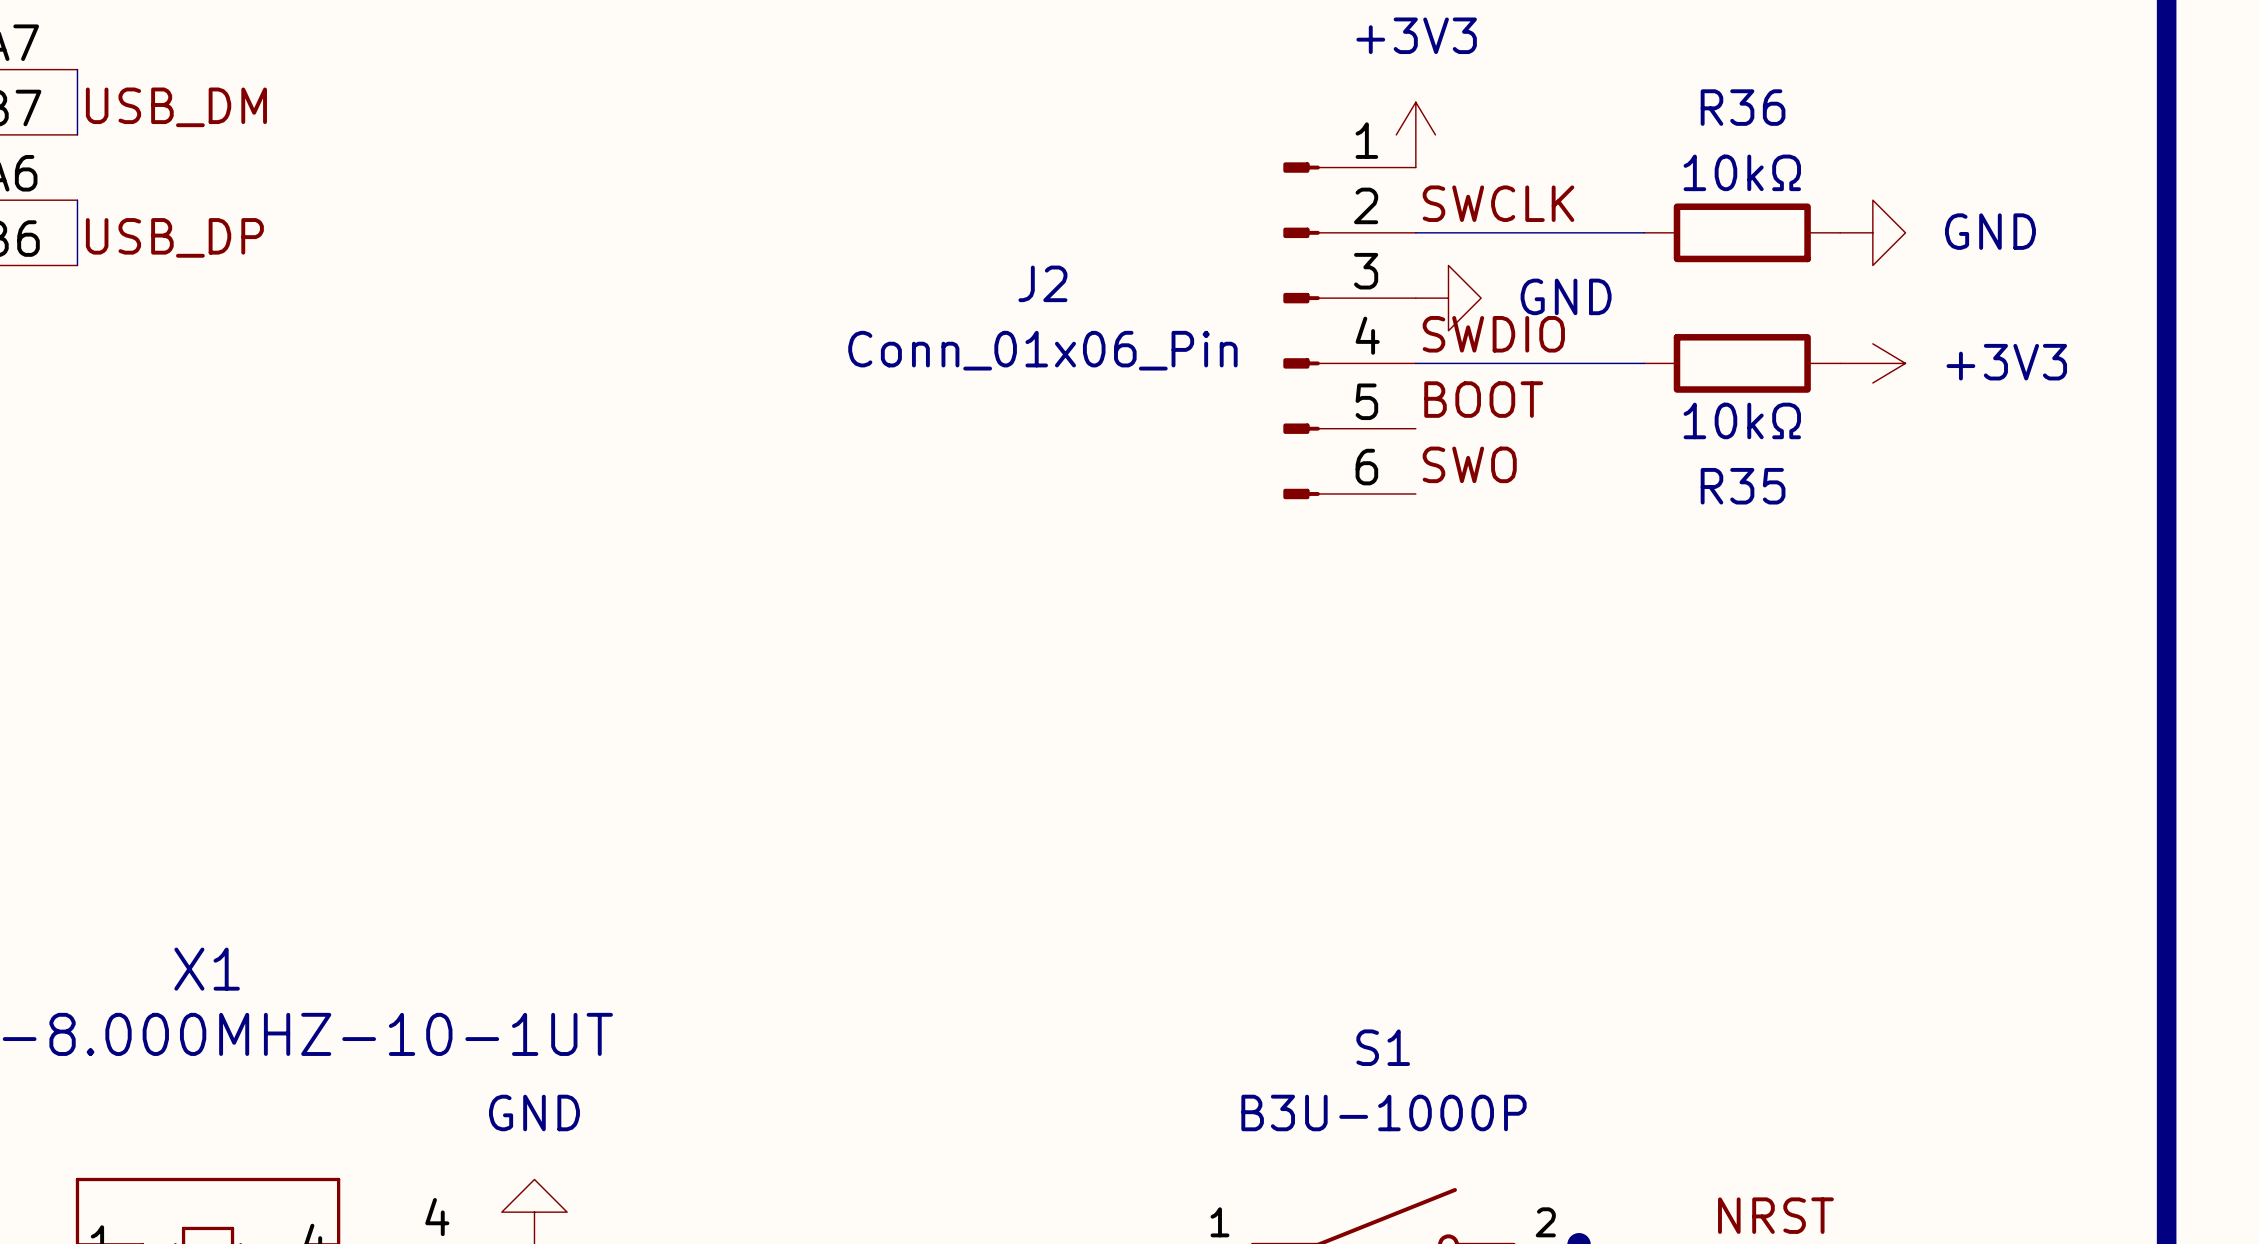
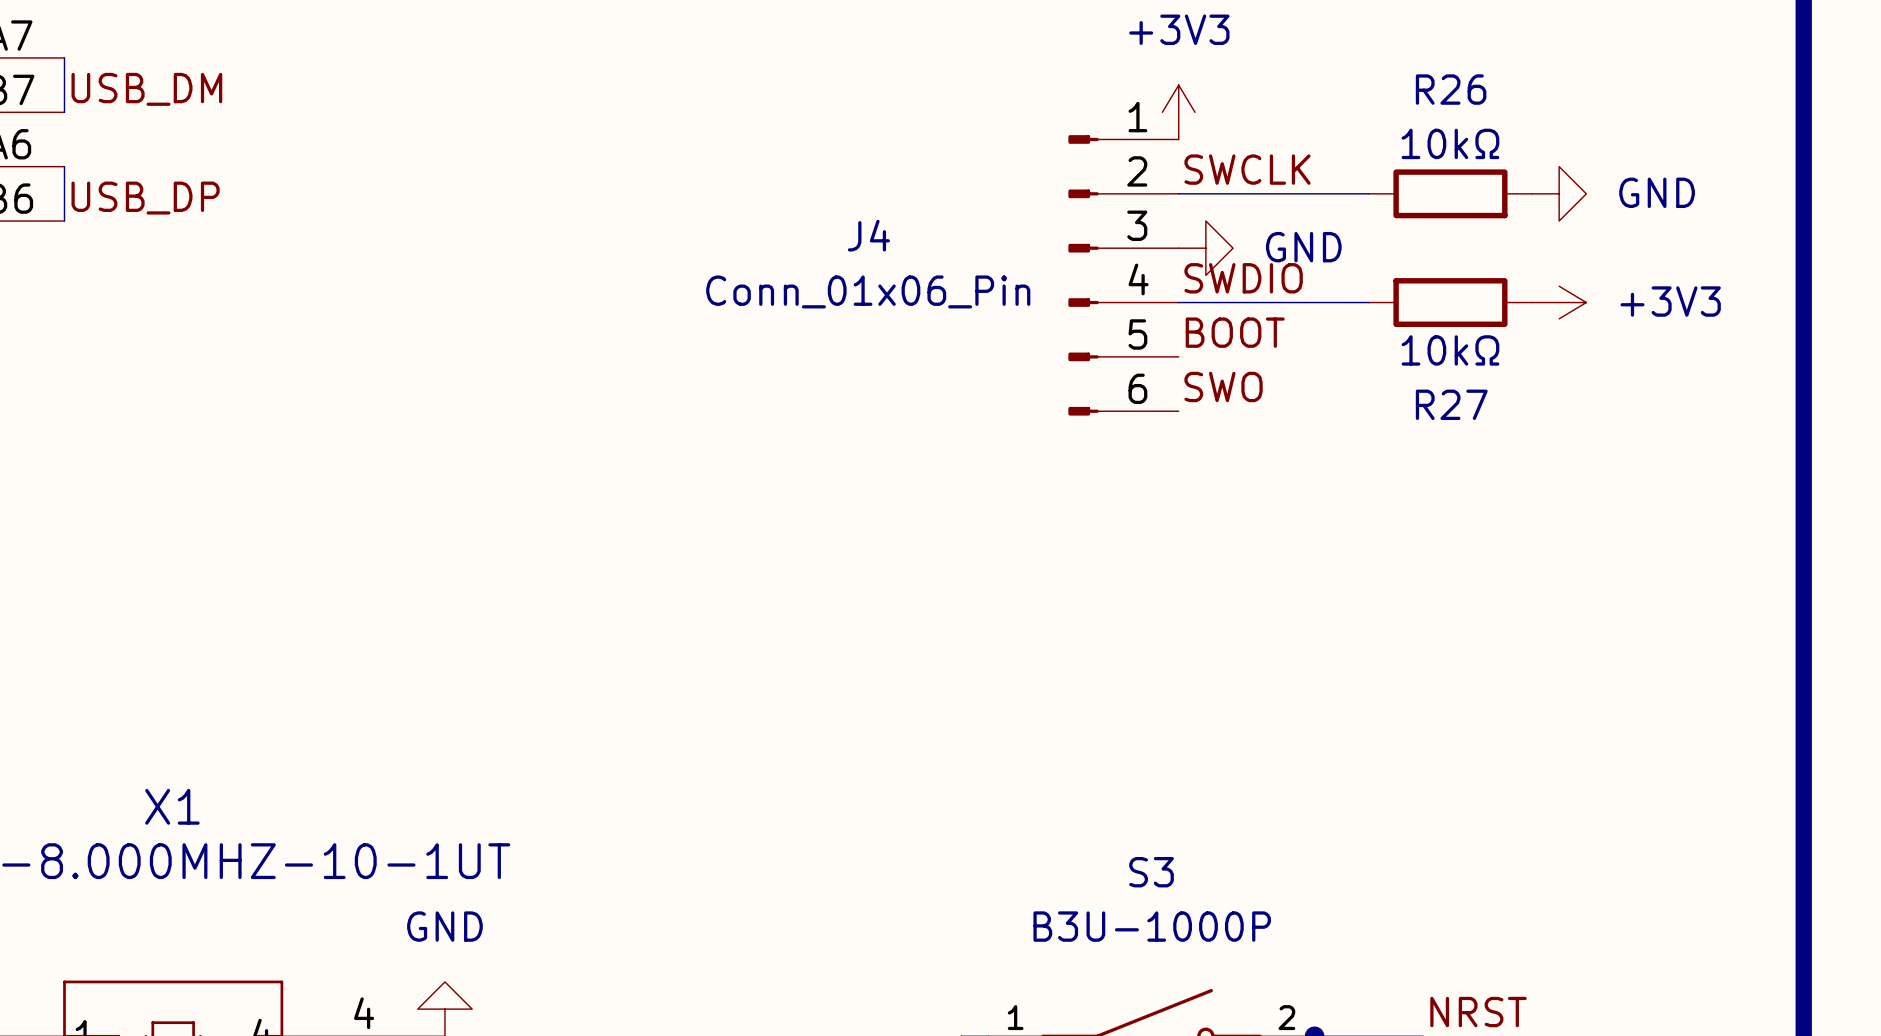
R36 name: R36 (1743, 107) -> R26 (1451, 89)
J2 name: J2 (1042, 283) -> J4 (868, 235)
R35 name: R35 (1743, 486) -> R27 (1451, 404)
S1 name: S1 (1383, 1047) -> S3 (1151, 872)

